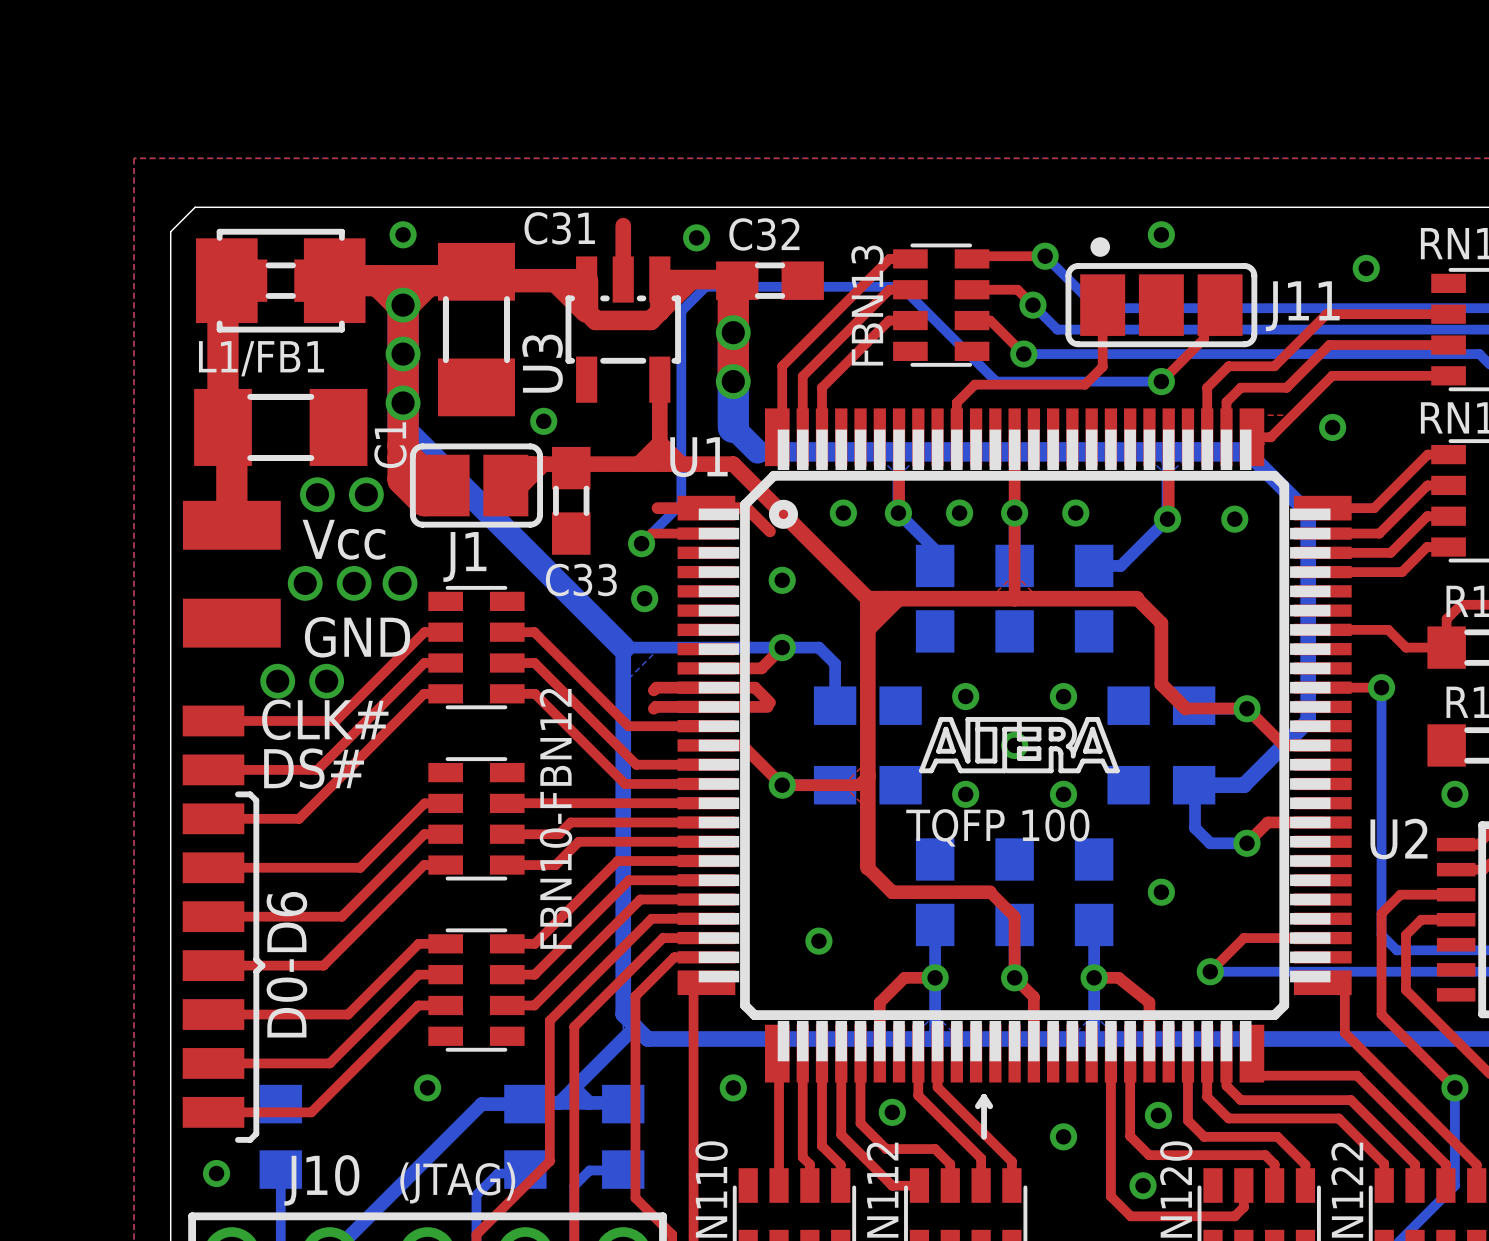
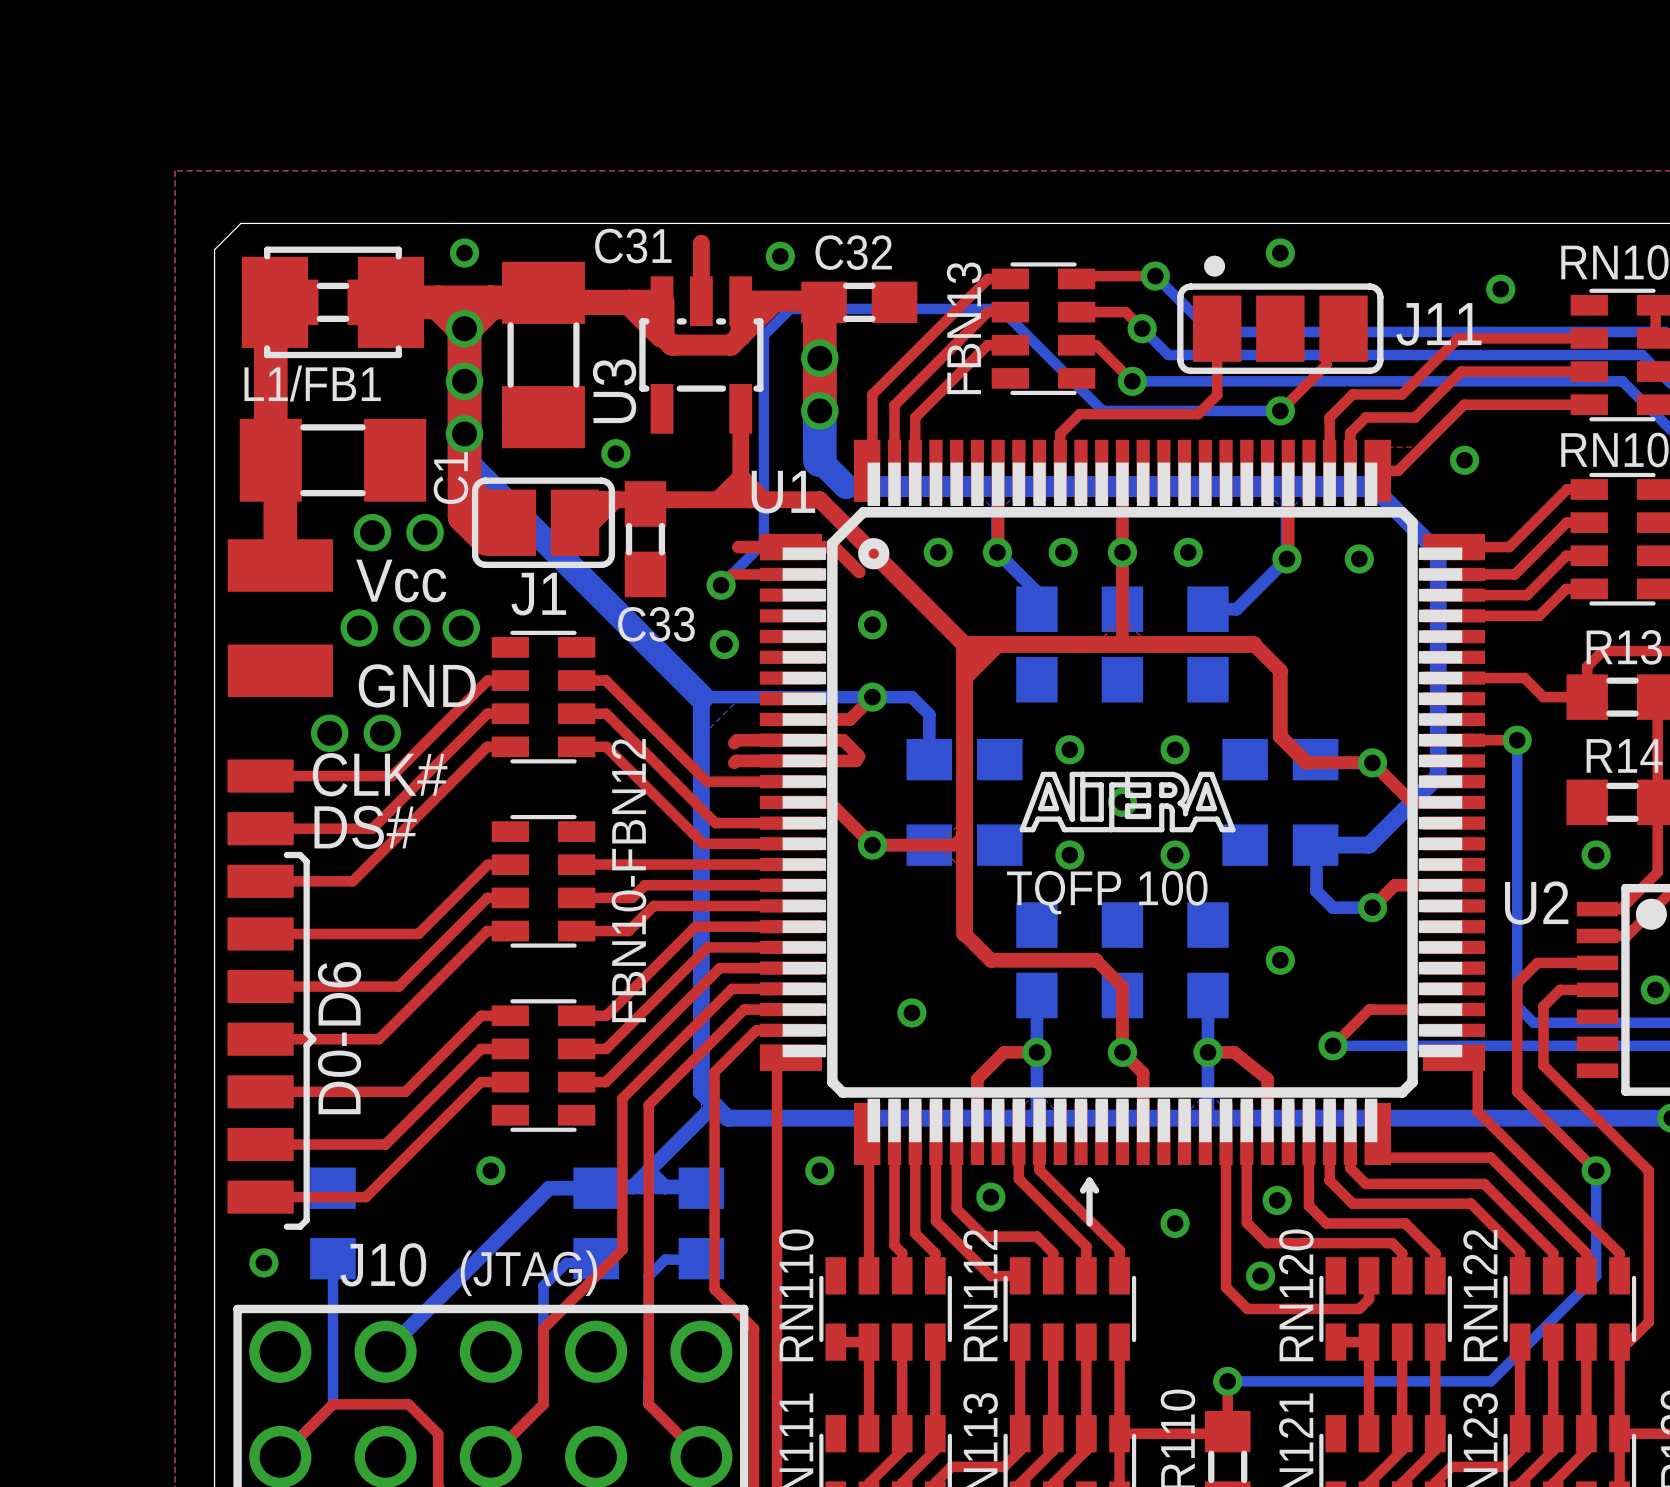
part footprint: [437, 242, 515, 417] -> [502, 261, 585, 449]
part footprint: [194, 388, 368, 466] -> [239, 418, 427, 502]

